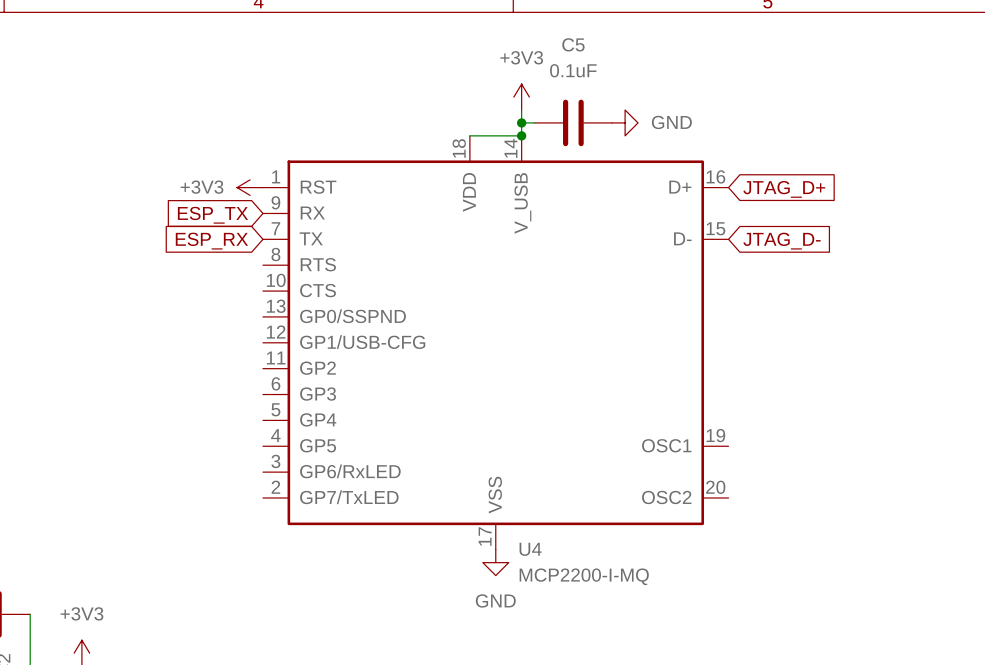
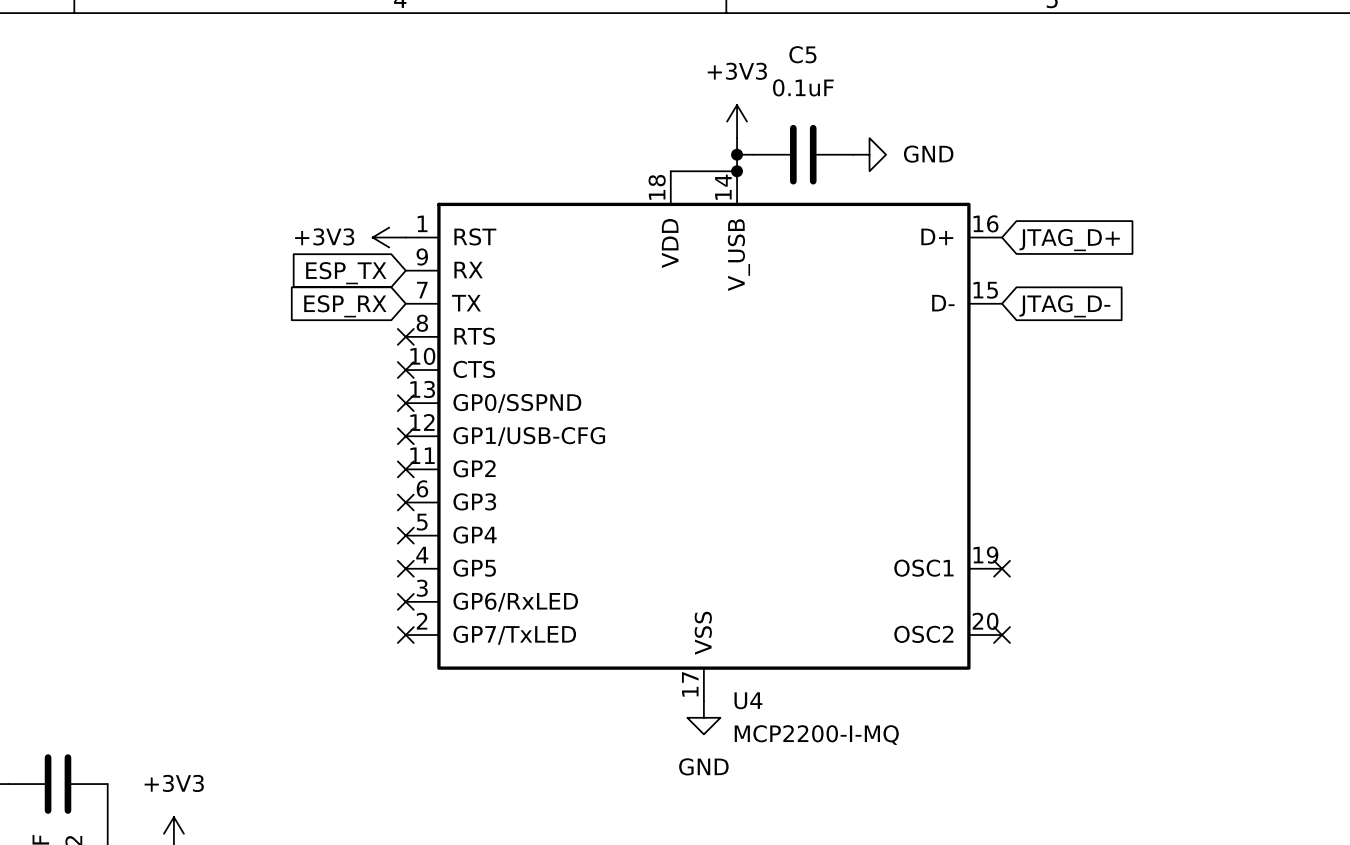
no-connect mark: none -> (405, 336)
no-connect mark: none -> (405, 370)
no-connect mark: none -> (405, 403)
no-connect mark: none -> (405, 436)
no-connect mark: none -> (405, 469)
no-connect mark: none -> (405, 502)
no-connect mark: none -> (405, 535)
no-connect mark: none -> (405, 568)
no-connect mark: none -> (1002, 568)
no-connect mark: none -> (405, 601)
no-connect mark: none -> (405, 635)
no-connect mark: none -> (1002, 635)

